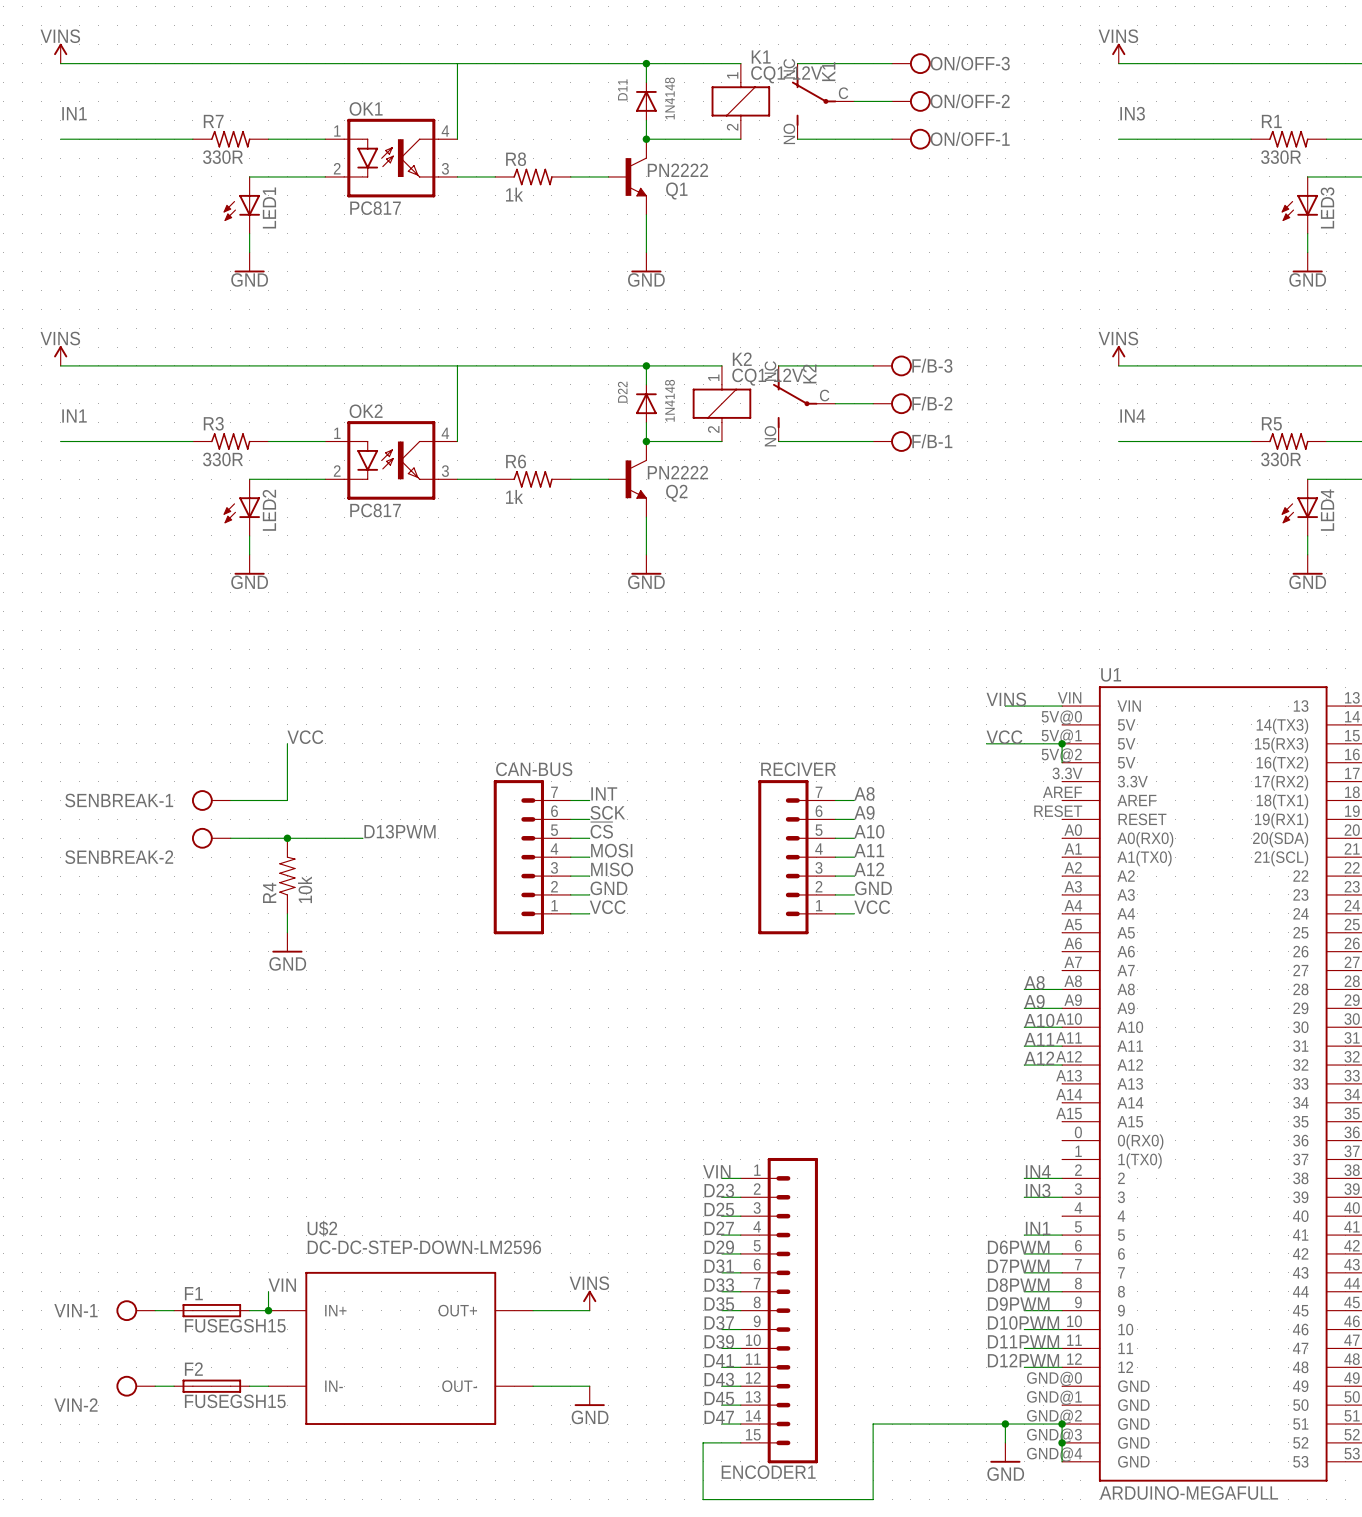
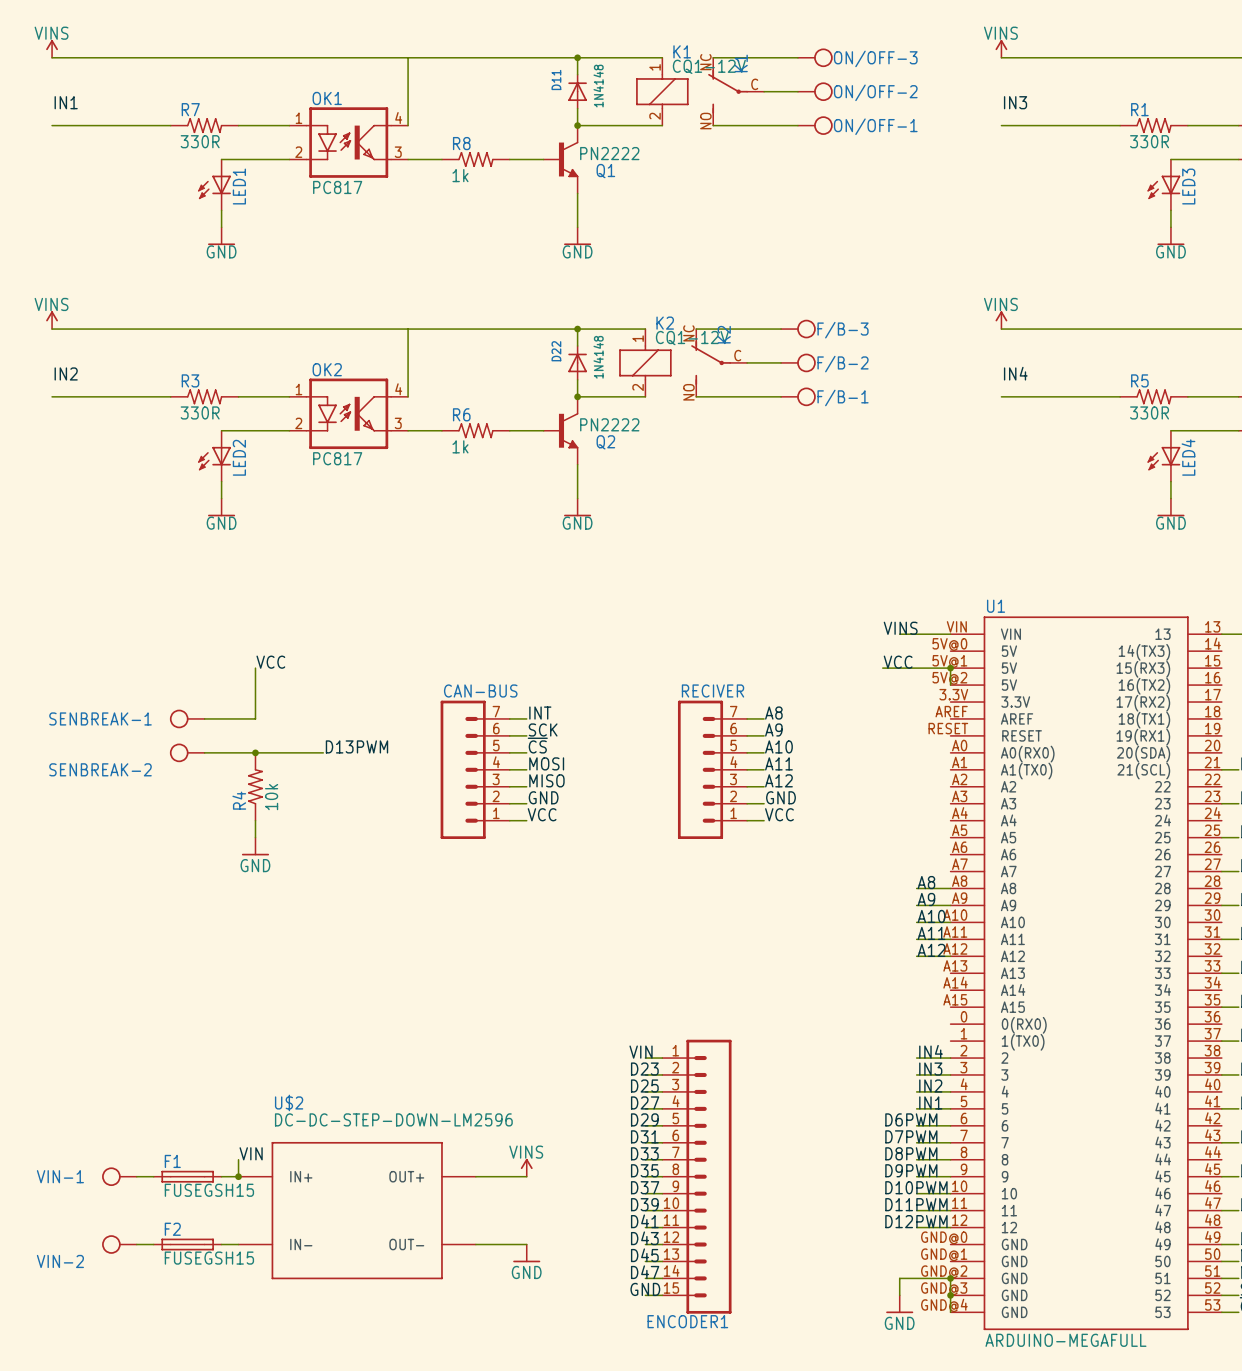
label: IN1 (74, 416) -> IN2 (66, 373)
label: none -> IN2 (930, 1086)
wire: none -> (916, 1091) (950, 1091)
wire: (1005, 1424) (873, 1424) (873, 1499) (703, 1499) (703, 1442) (721, 1442) -> none
junction: (1005, 1424) -> none
label: none -> GND (645, 1289)

